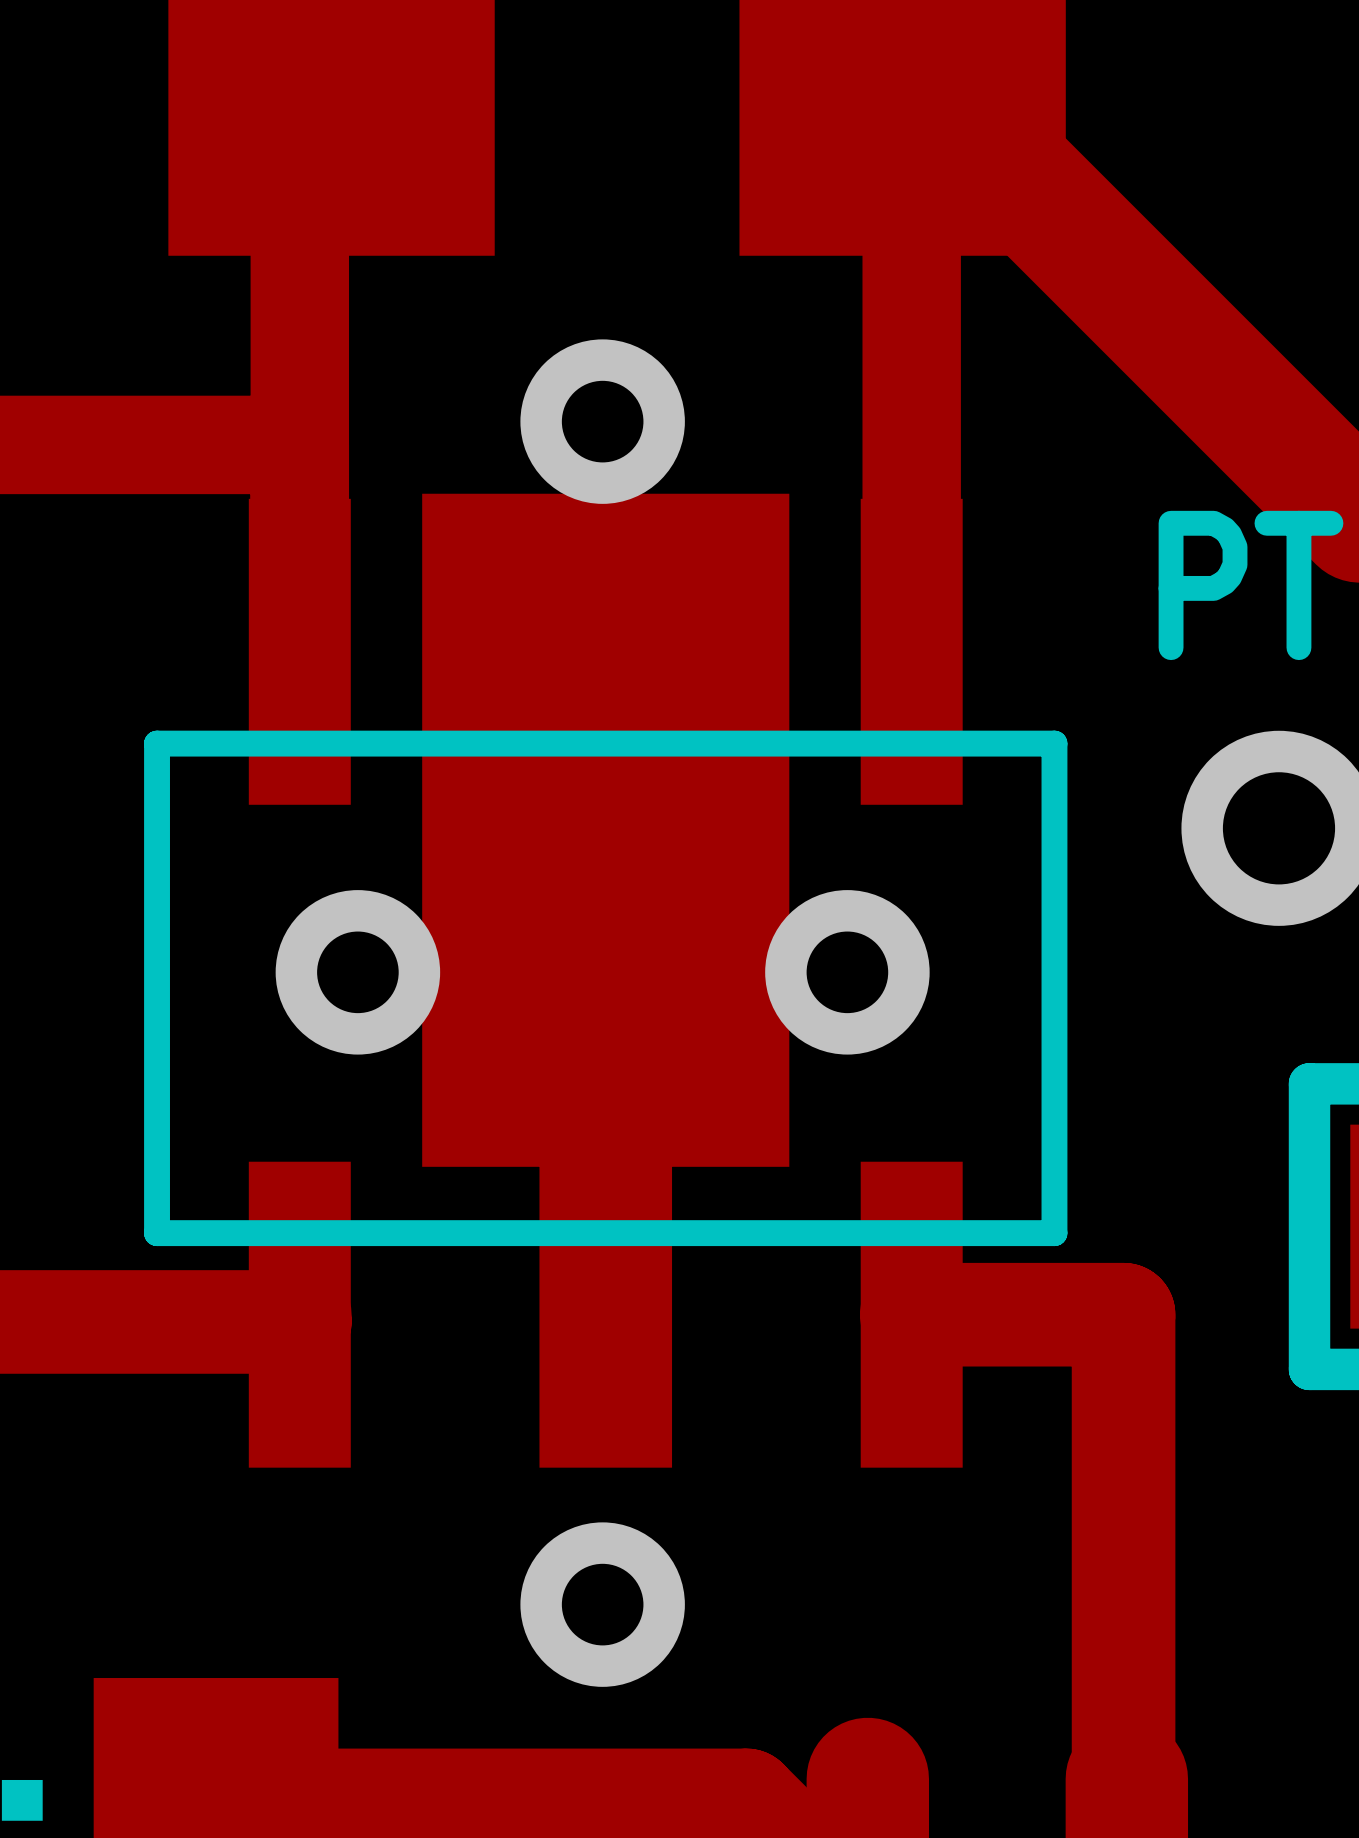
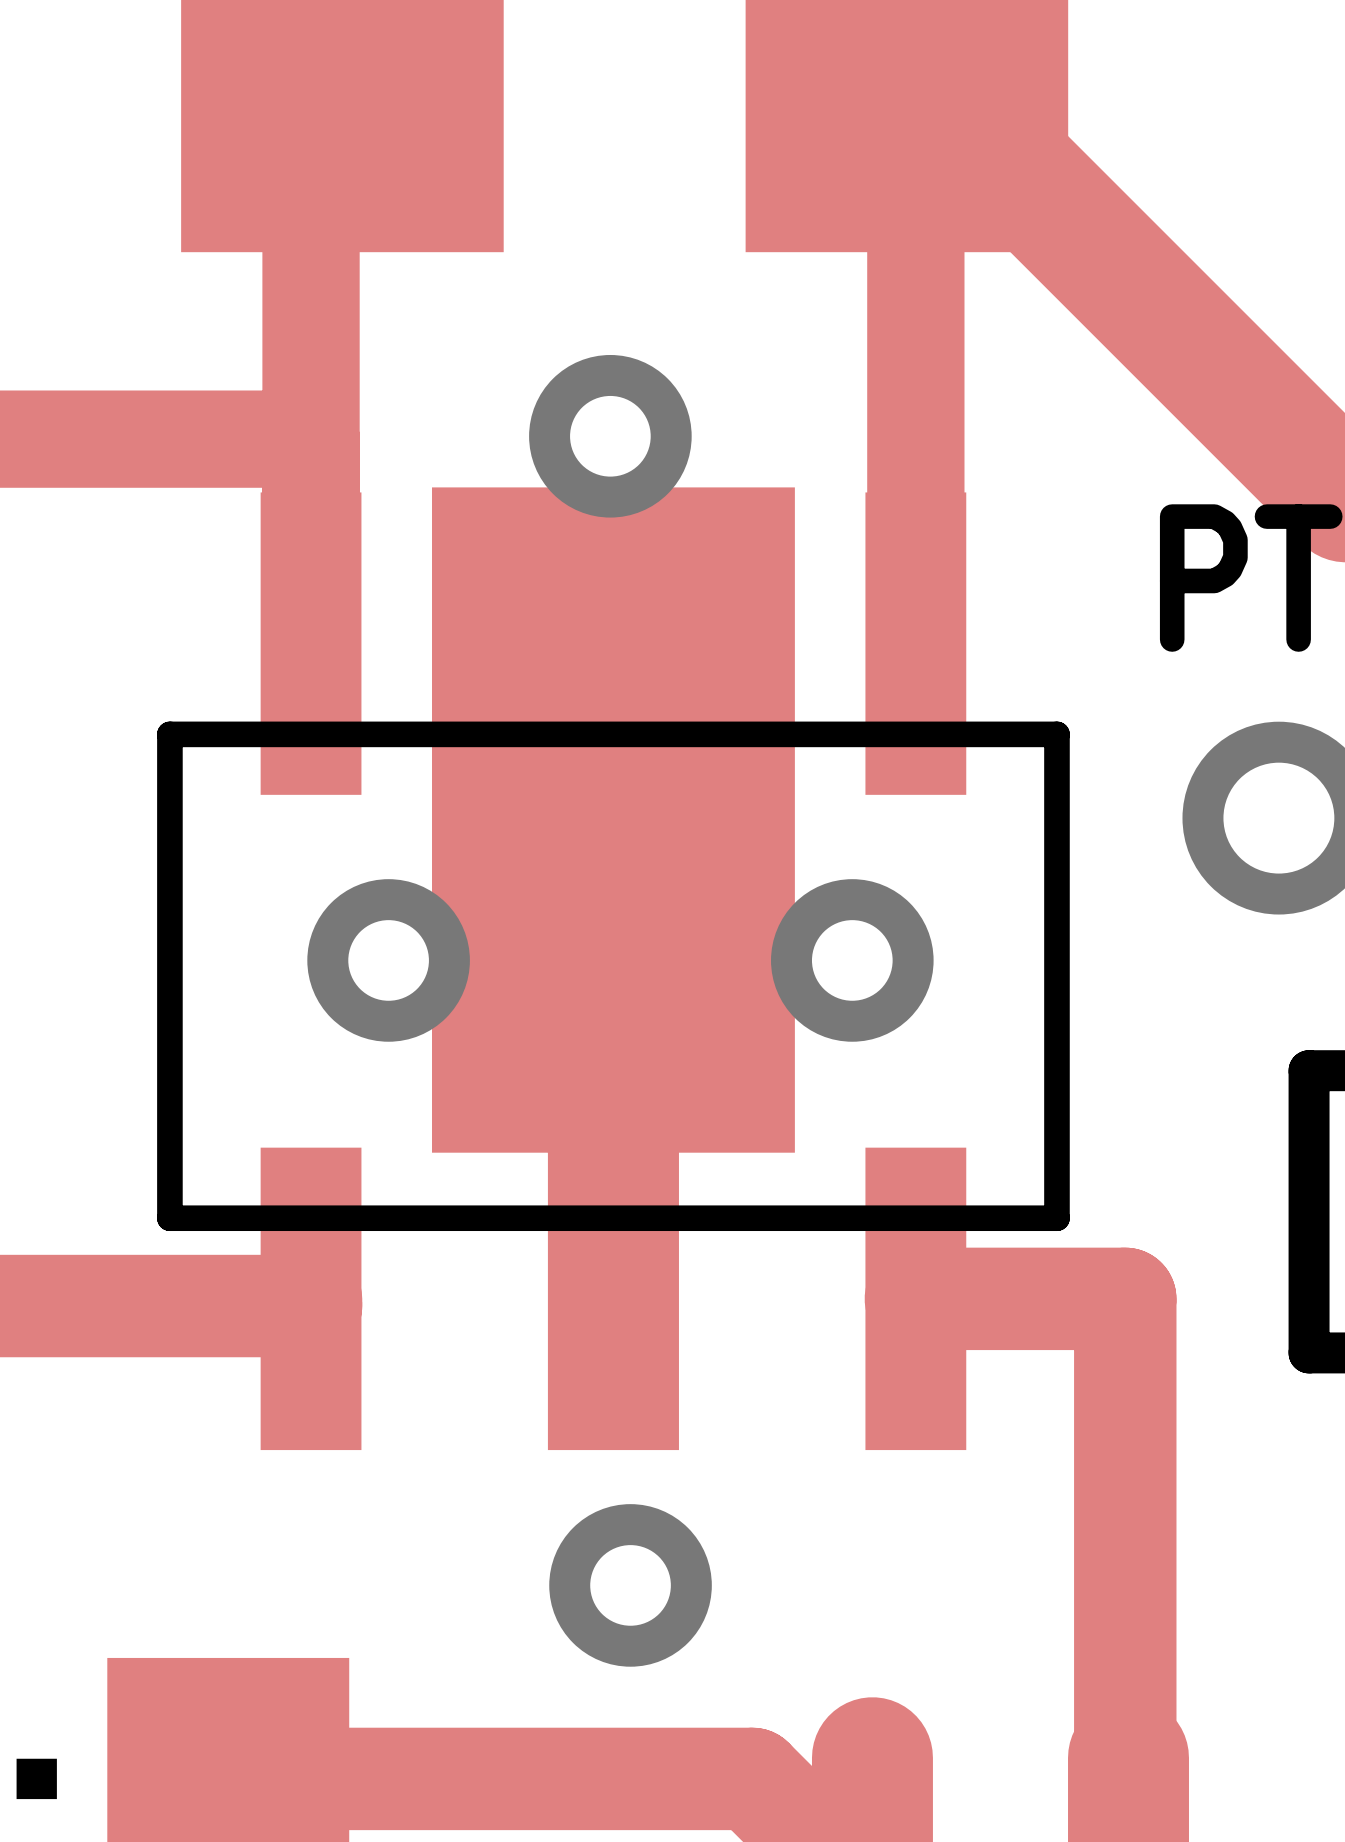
via position: (602, 421) -> (610, 436)
via position: (357, 972) -> (388, 960)
via position: (602, 1604) -> (630, 1585)

